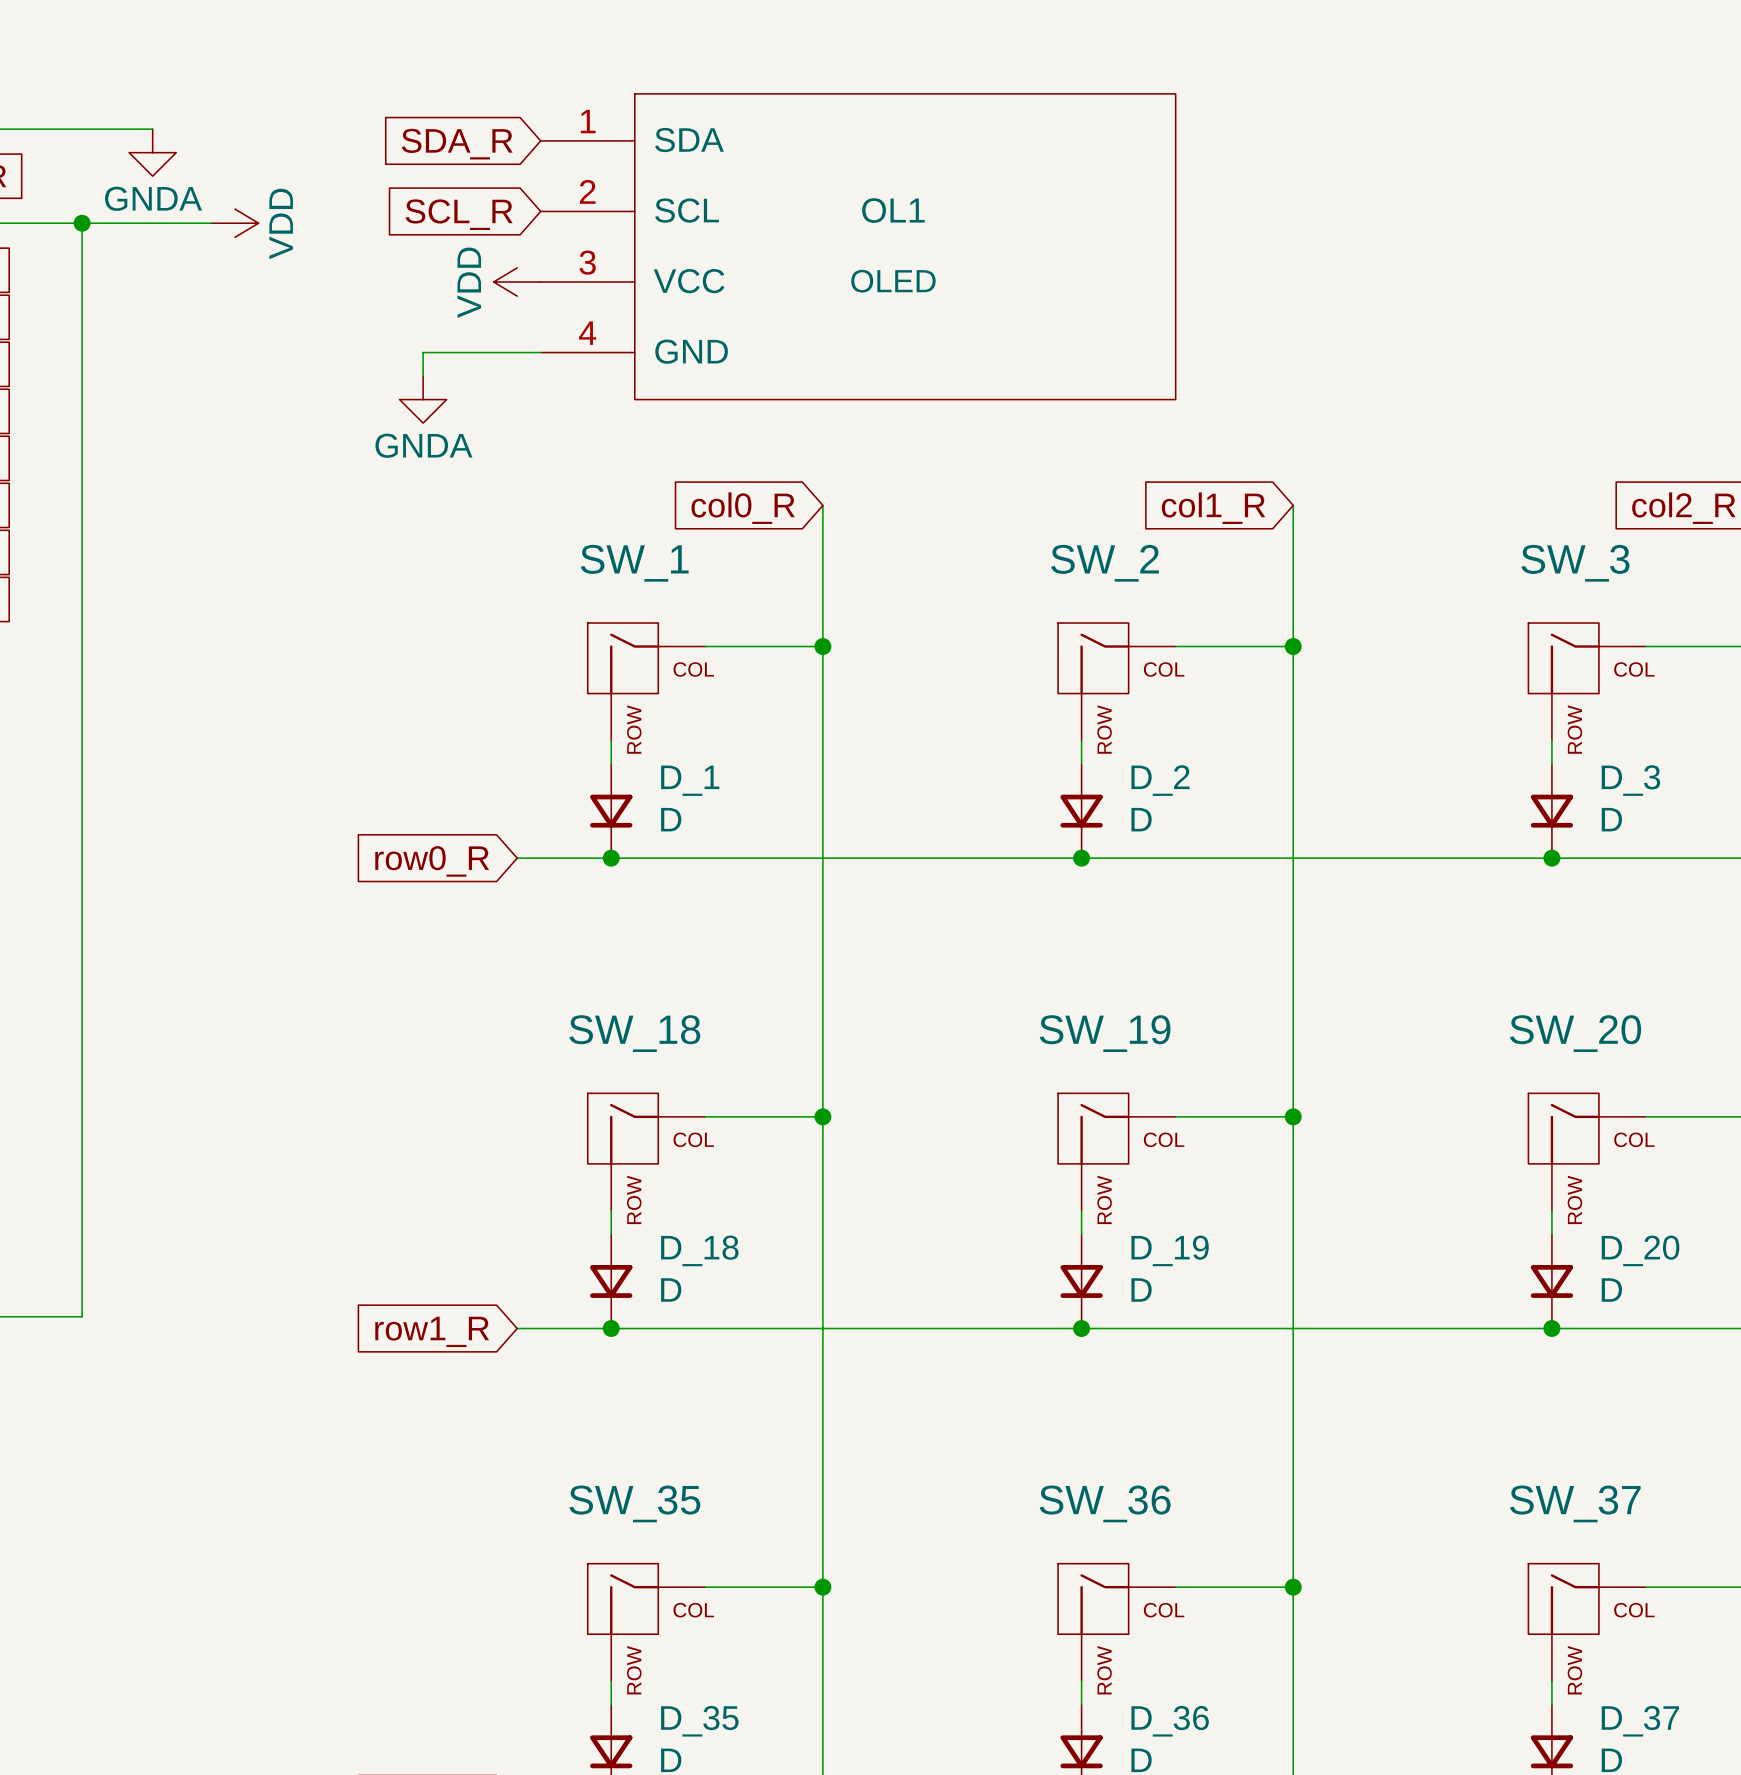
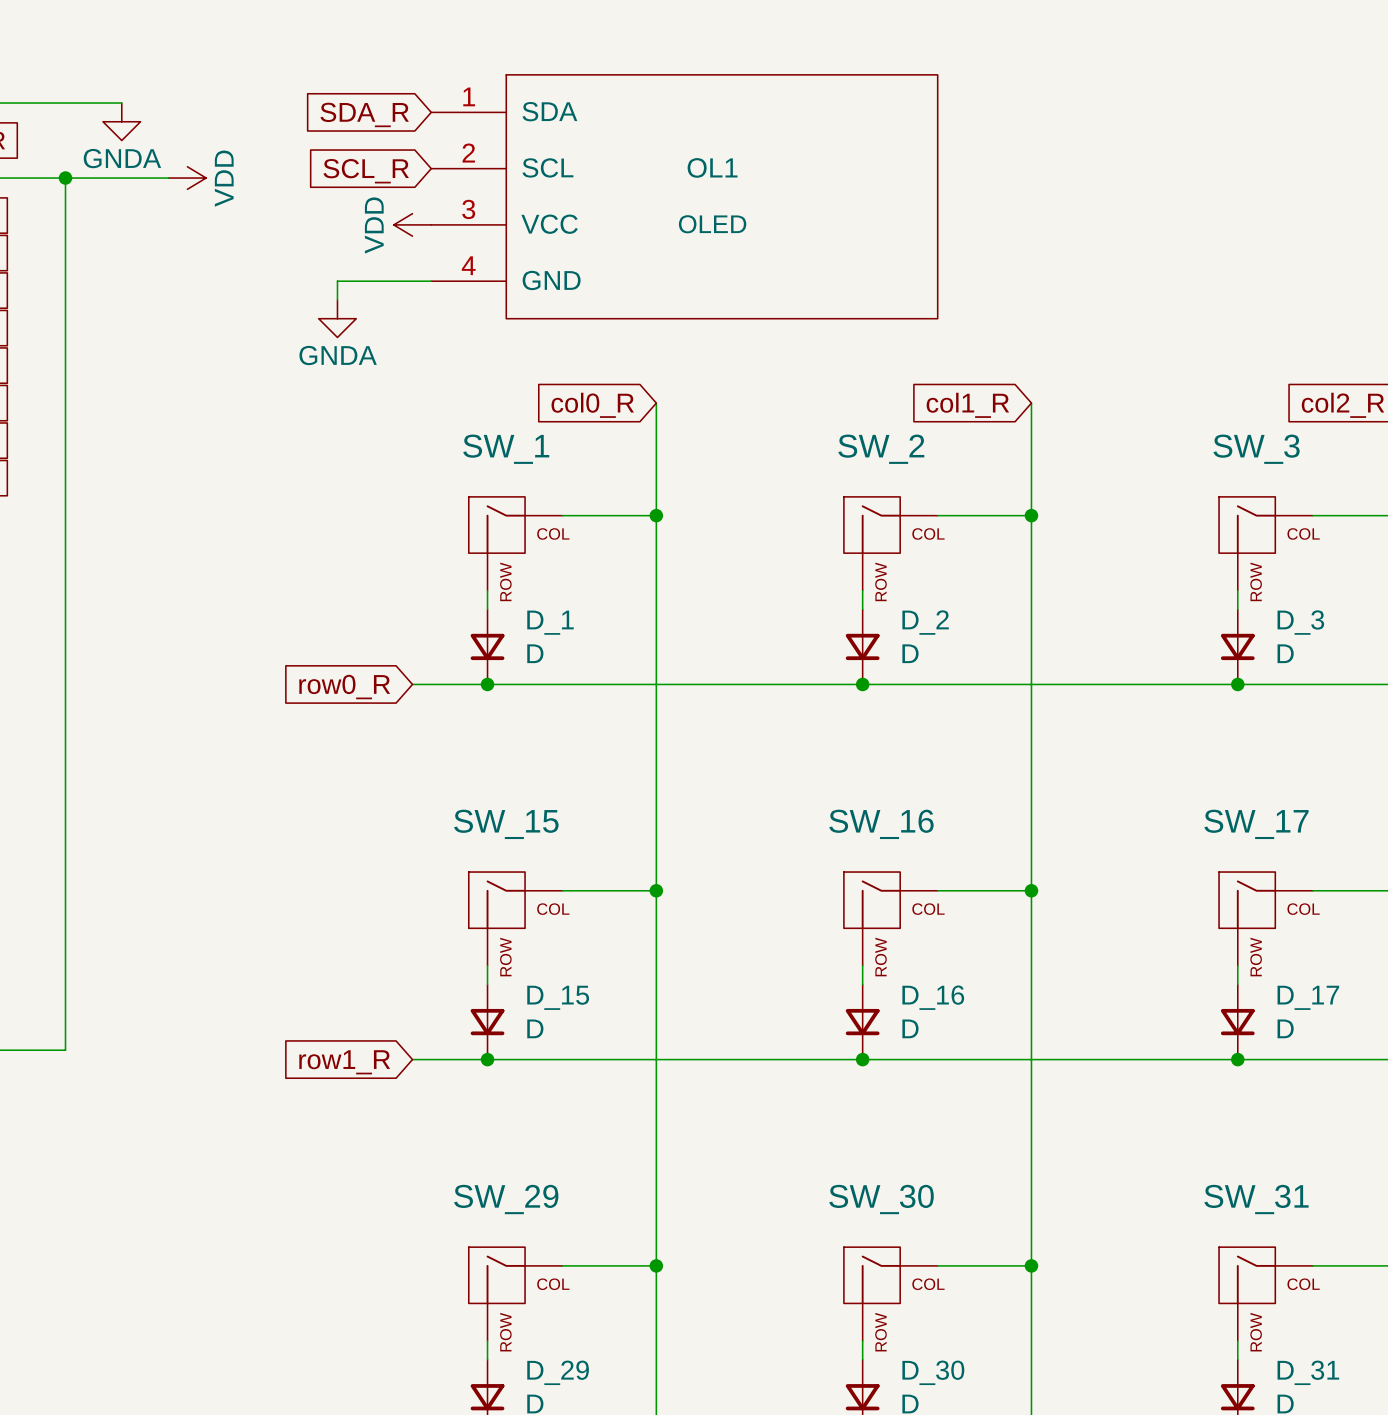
SW_18 name: SW_18 (634, 1033) -> SW_15 (506, 824)
SW_19 name: SW_19 (1105, 1033) -> SW_16 (881, 824)
SW_20 name: SW_20 (1575, 1033) -> SW_17 (1256, 824)
D_18 name: D_18 (699, 1250) -> D_15 (558, 997)
D_19 name: D_19 (1170, 1250) -> D_16 (933, 997)
D_20 name: D_20 (1640, 1250) -> D_17 (1308, 997)
SW_35 name: SW_35 (634, 1503) -> SW_29 (506, 1199)
SW_36 name: SW_36 (1105, 1503) -> SW_30 (881, 1199)
SW_37 name: SW_37 (1575, 1503) -> SW_31 (1256, 1199)
D_35 name: D_35 (699, 1721) -> D_29 (558, 1372)
D_36 name: D_36 (1170, 1721) -> D_30 (933, 1372)
D_37 name: D_37 (1640, 1721) -> D_31 (1308, 1372)

